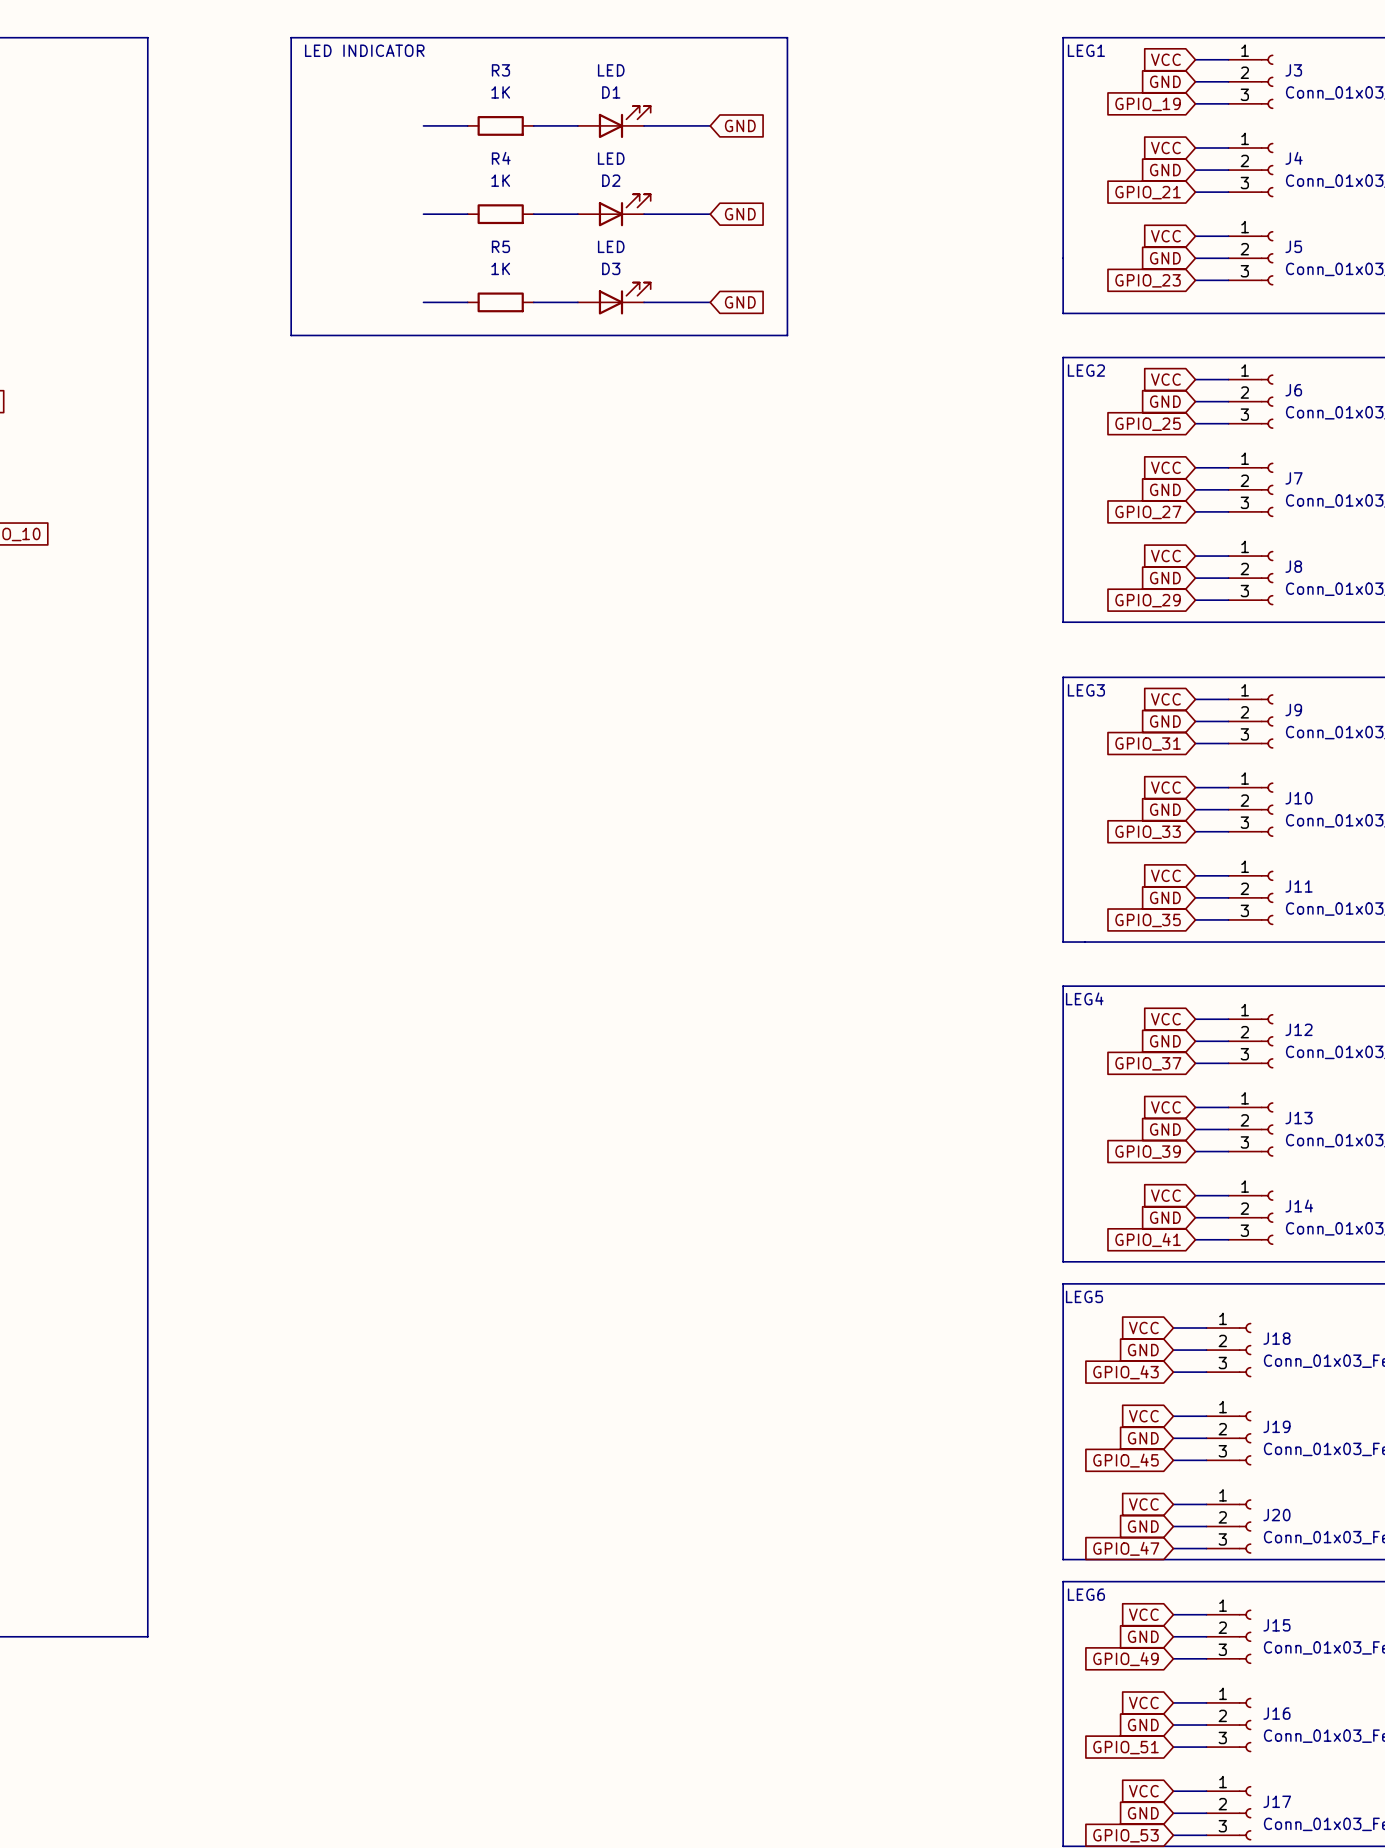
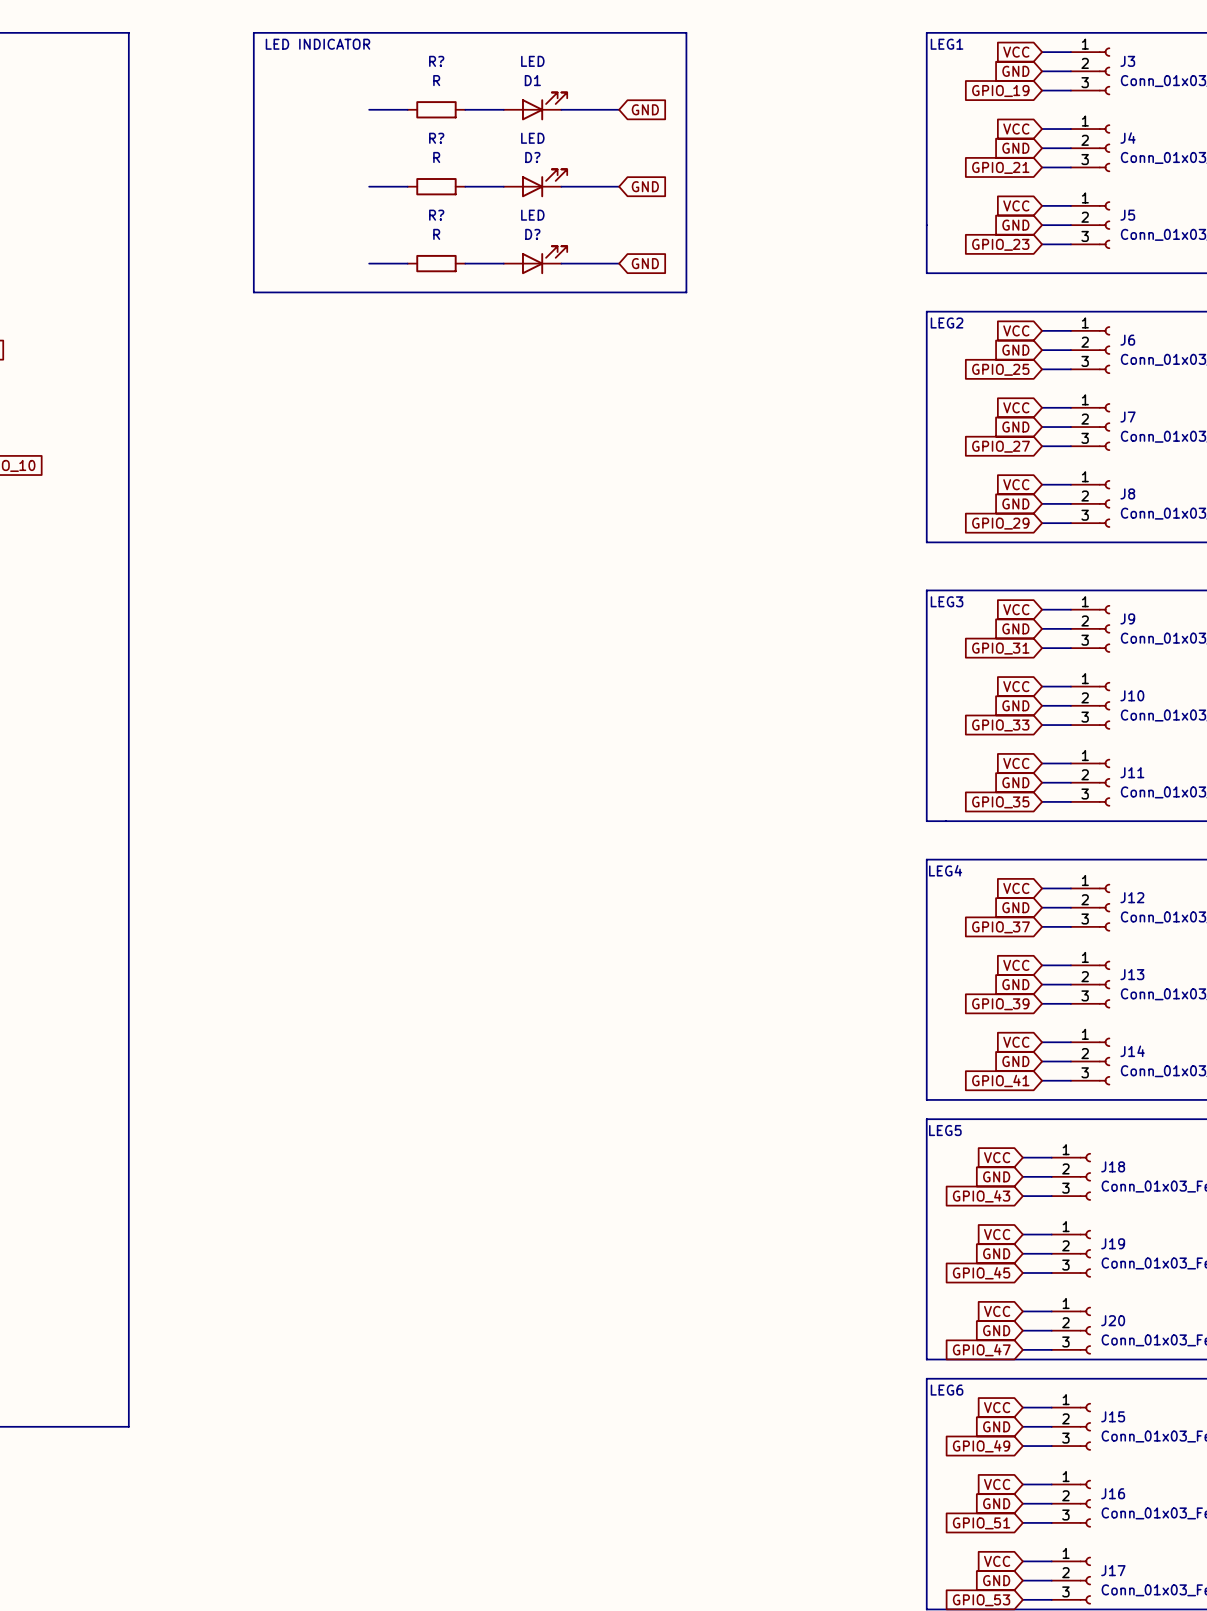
R3 name: R3 (500, 70) -> R? (436, 61)
R3 value: 1K (500, 92) -> R (436, 80)
R4 name: R4 (501, 158) -> R? (436, 138)
R4 value: 1K (500, 180) -> R (436, 157)
D2 name: D2 (611, 180) -> D? (532, 157)
R5 name: R5 (500, 246) -> R? (436, 215)
R5 value: 1K (500, 268) -> R (436, 234)
D3 name: D3 (611, 268) -> D? (532, 234)

